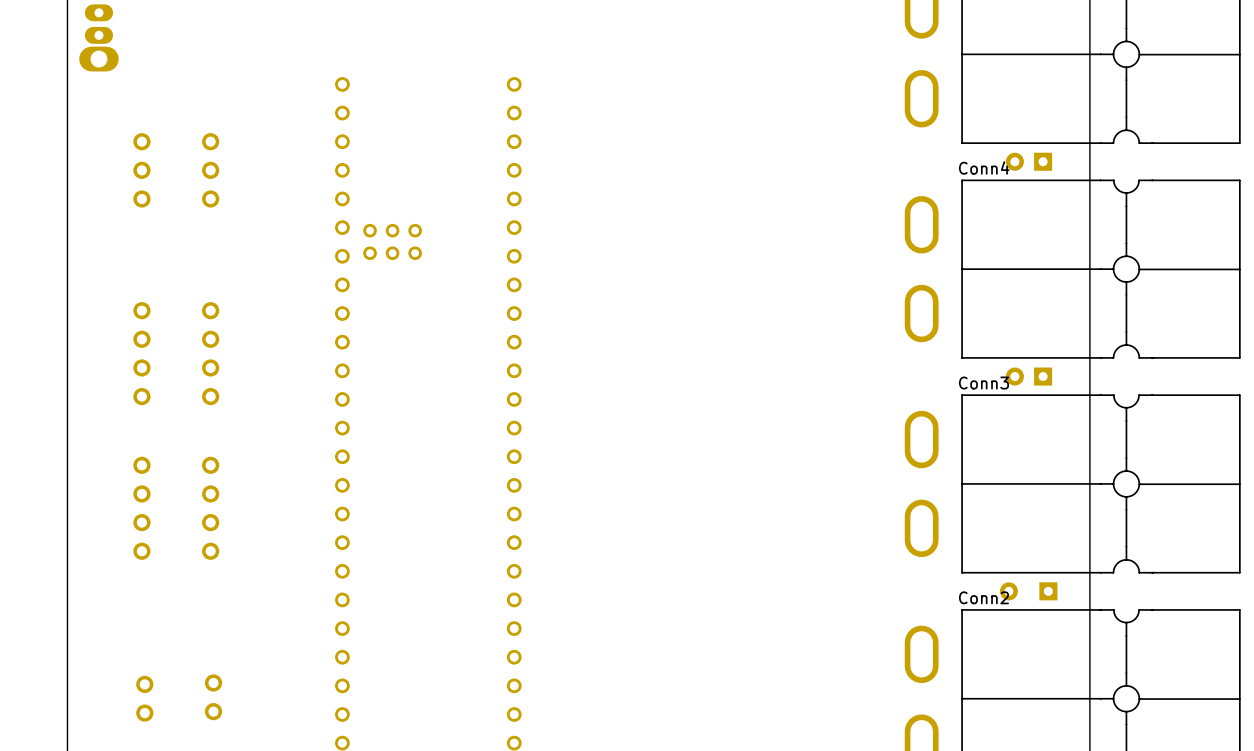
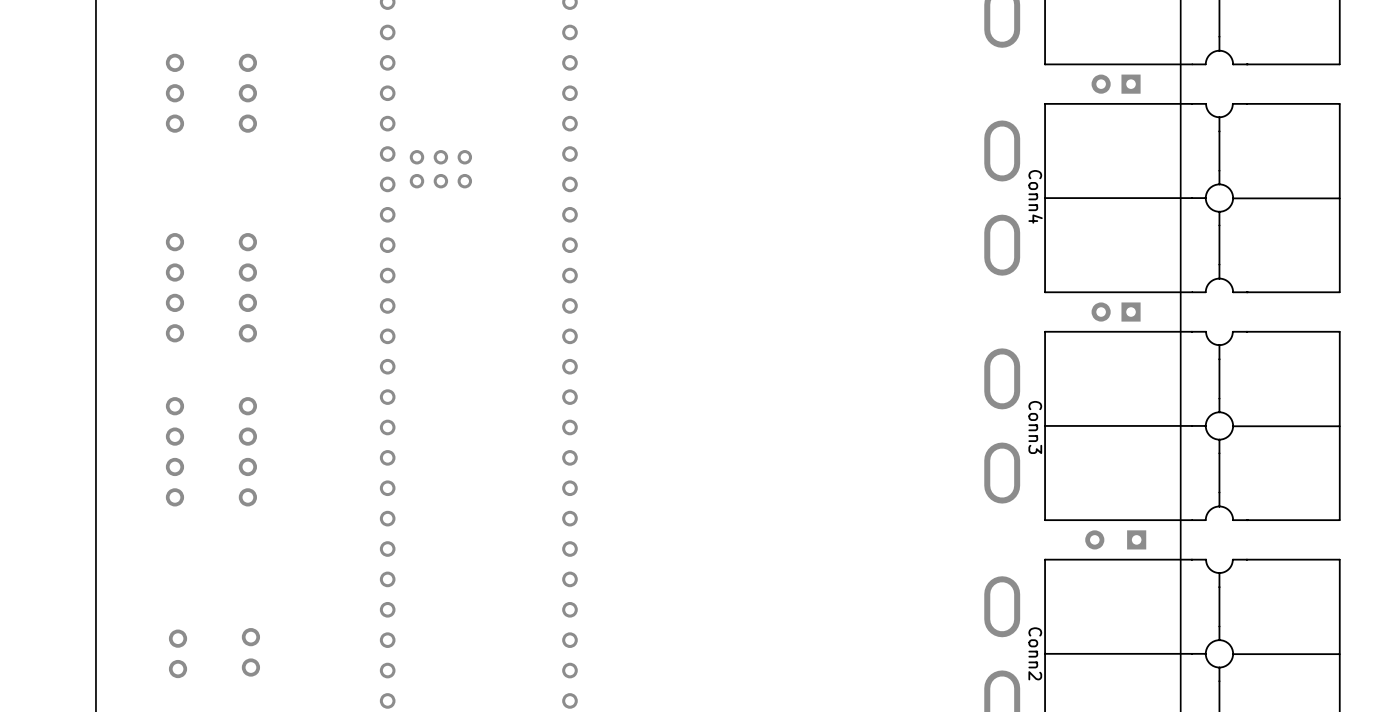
Conn4 name rotation: 0° (984, 167) -> 90° clockwise (1035, 196)
Conn4 name position: Conn4 (984, 167) -> Conn4 (1035, 196)
Conn3 name rotation: 0° (983, 383) -> 90° clockwise (1035, 427)
Conn3 name position: Conn3 (983, 383) -> Conn3 (1035, 427)
Conn2 name rotation: 0° (983, 597) -> 90° clockwise (1035, 653)
Conn2 name position: Conn2 (983, 597) -> Conn2 (1035, 653)

